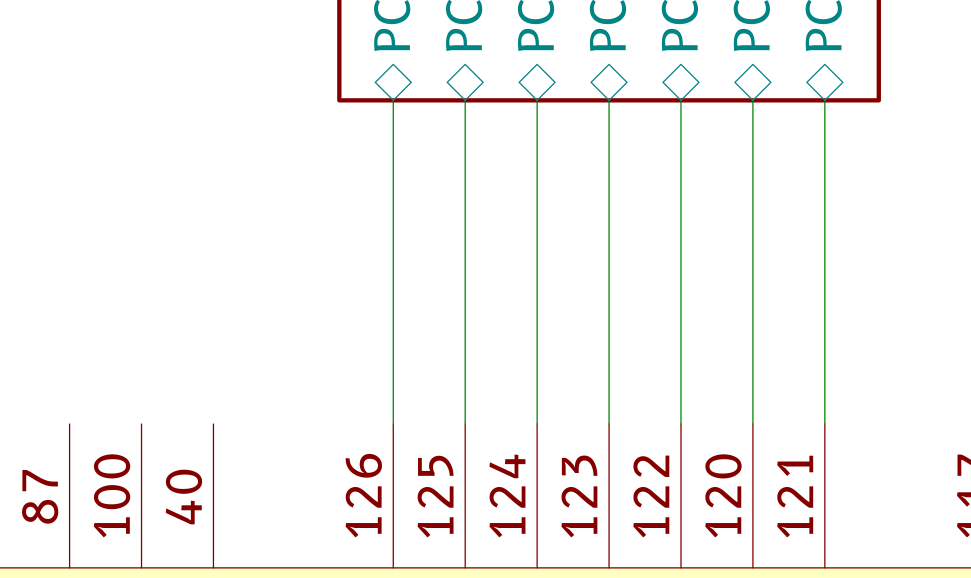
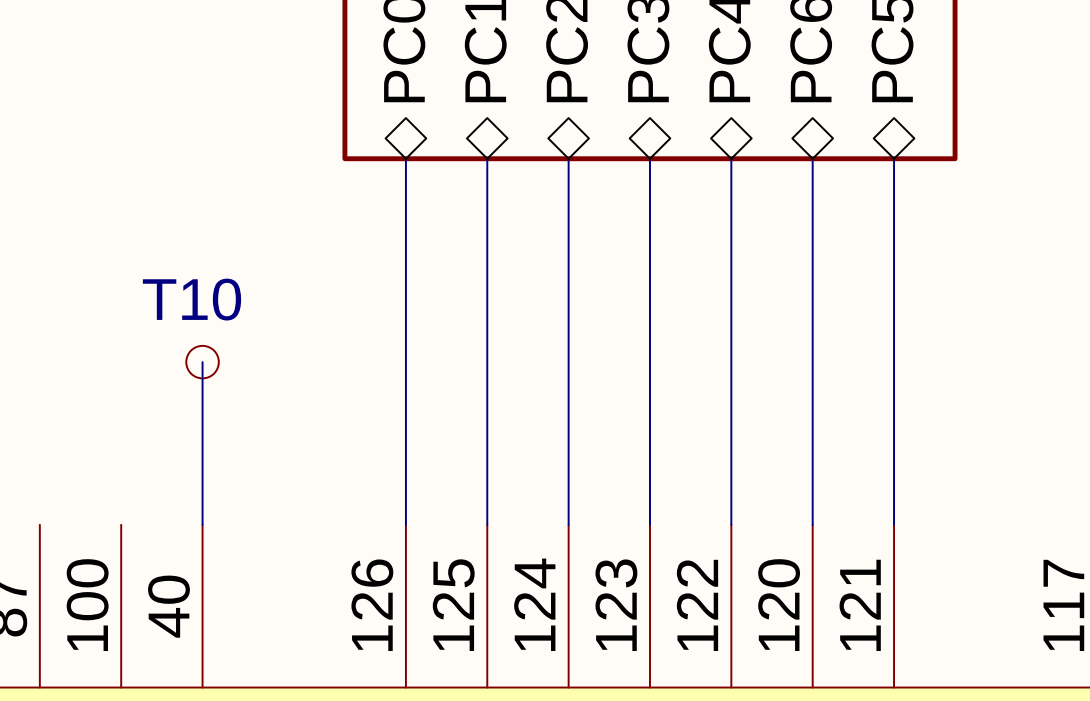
wire: none -> (202, 362) (202, 524)
T10: none -> (202, 362)

